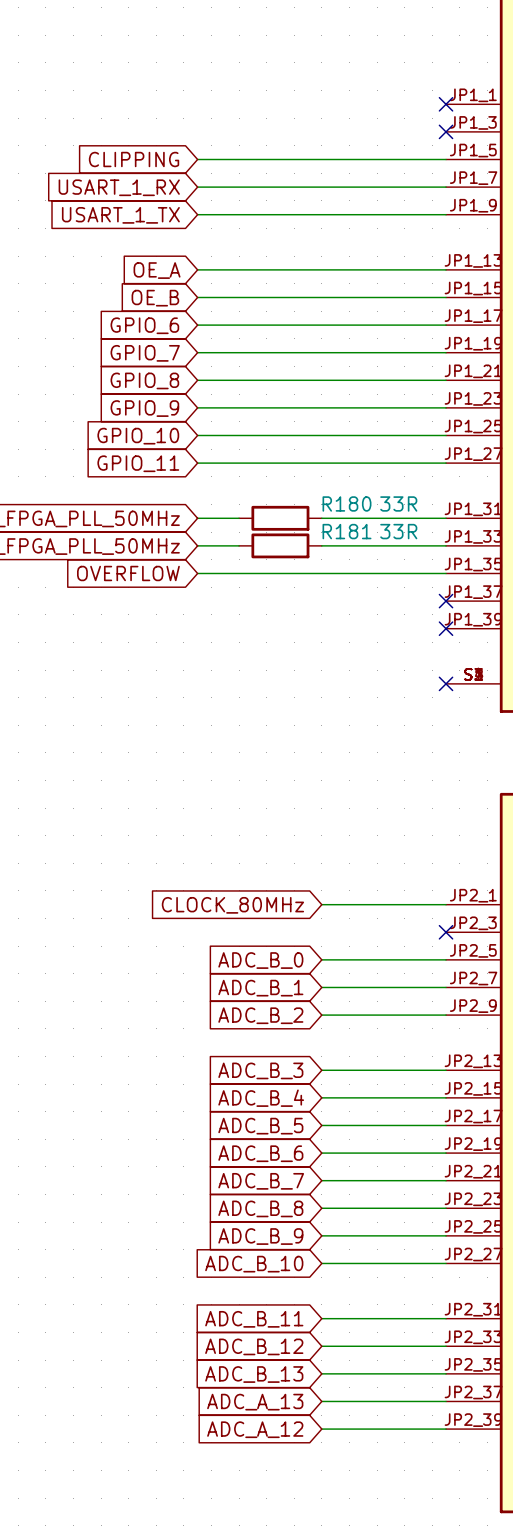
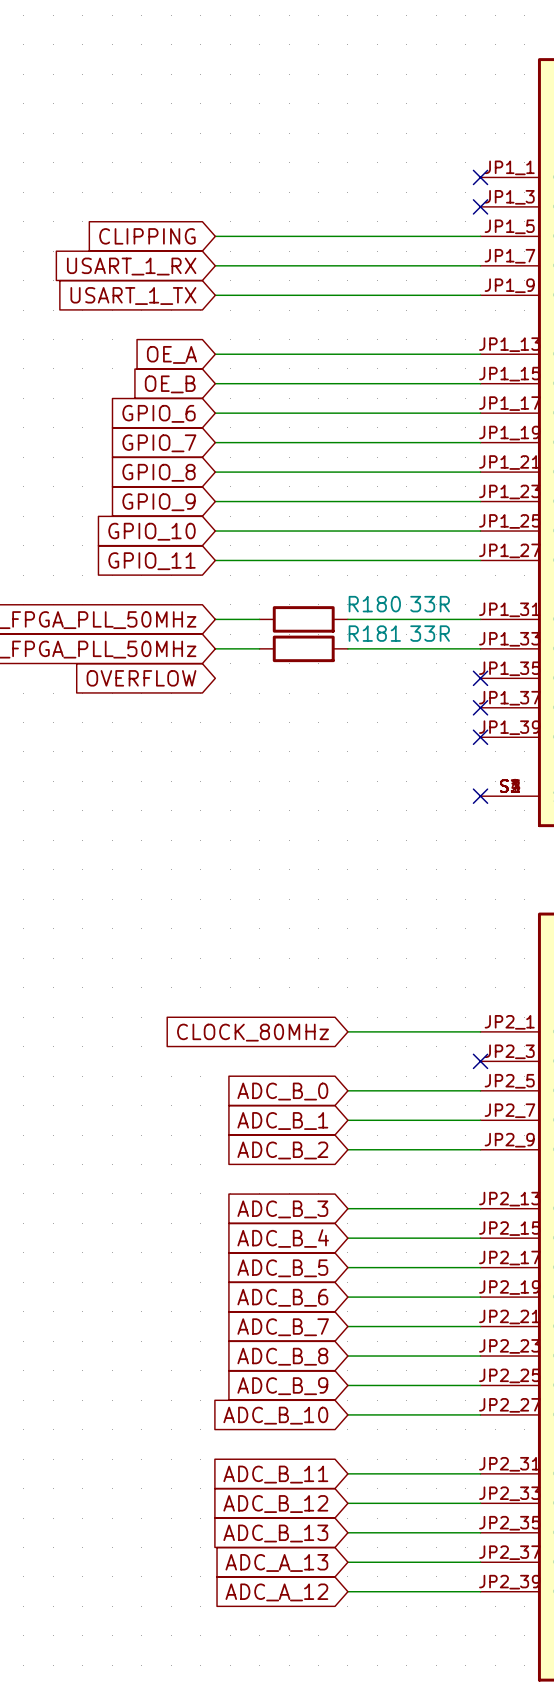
wire: (197, 573) (446, 573) -> none
no-connect mark: none -> (480, 678)

